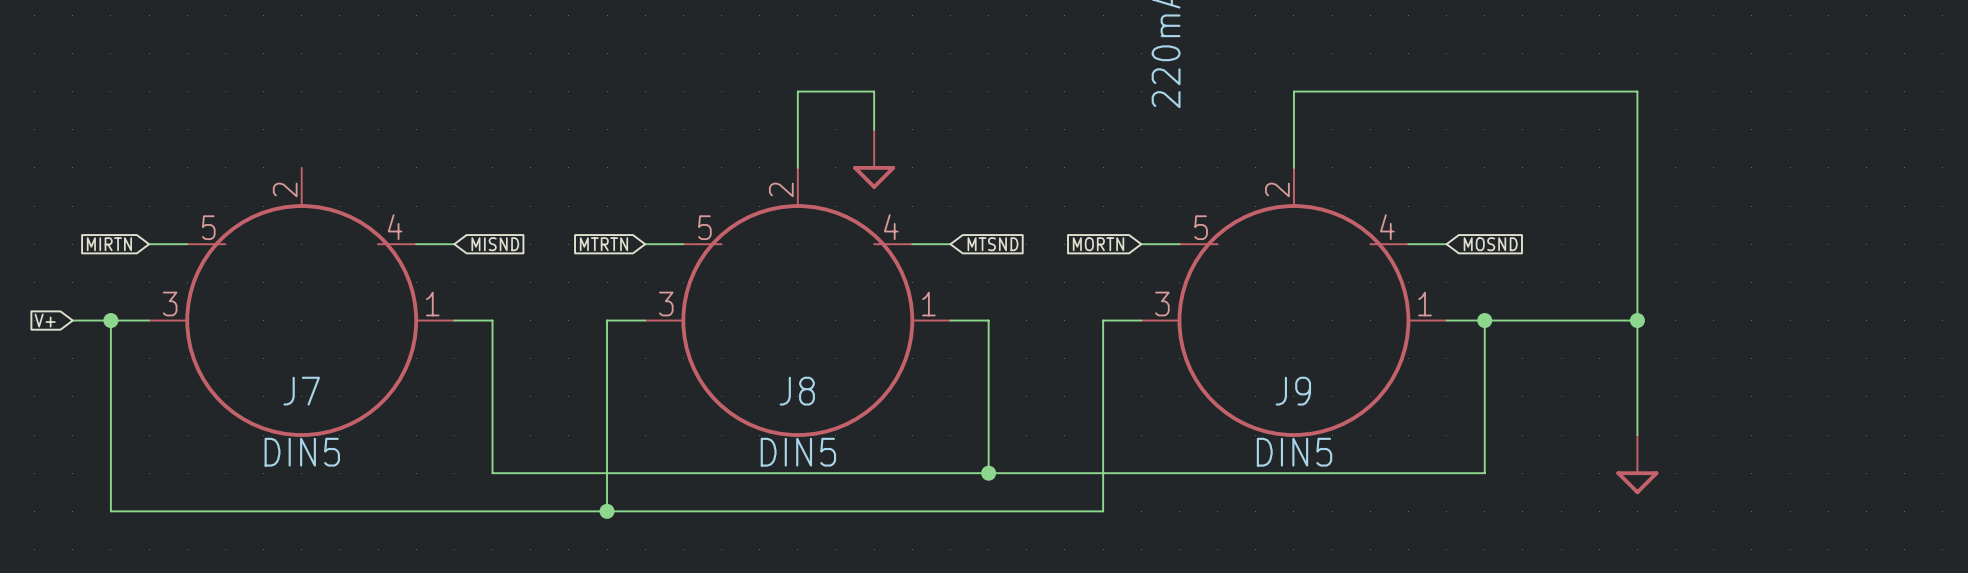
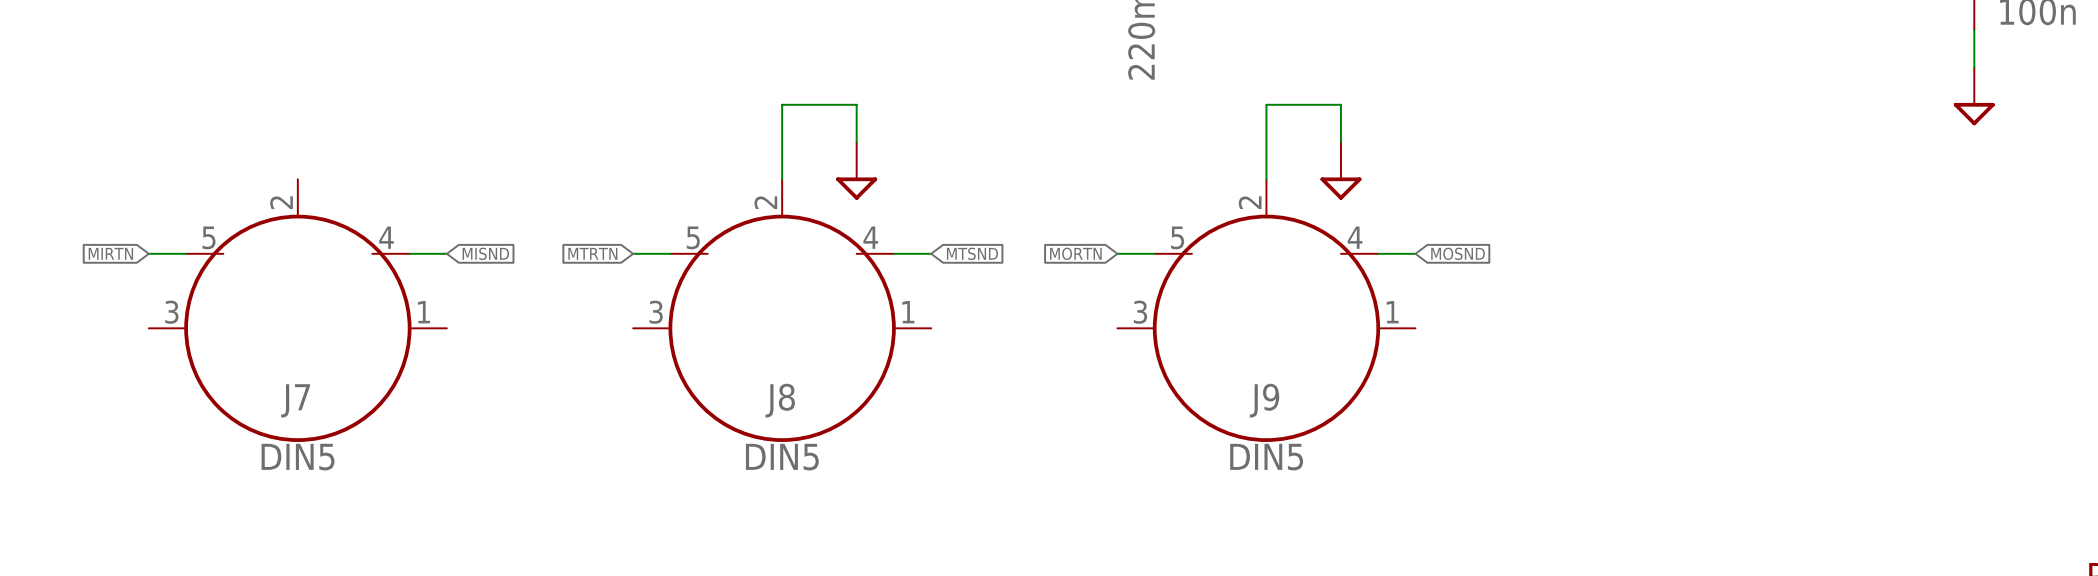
wire: (1370, 91) (1637, 91) (1637, 435) -> (1340, 104) (1340, 142)
power symbol: none -> (1340, 170)
global label: V+ (45, 320) -> none
wire: (72, 320) (149, 320) -> none
wire: (110, 320) (110, 511) (1103, 511) (1103, 320) (1141, 320) -> none
junction: (110, 320) -> none
wire: (454, 320) (492, 320) (492, 473) (1484, 473) (1484, 320) -> none
wire: (645, 320) (607, 320) (607, 511) -> none
wire: (950, 320) (988, 320) (988, 473) -> none
wire: (1446, 320) (1637, 320) -> none
junction: (1484, 320) -> none
junction: (1637, 320) -> none
power symbol: (1637, 464) -> none
junction: (988, 473) -> none
junction: (607, 511) -> none

